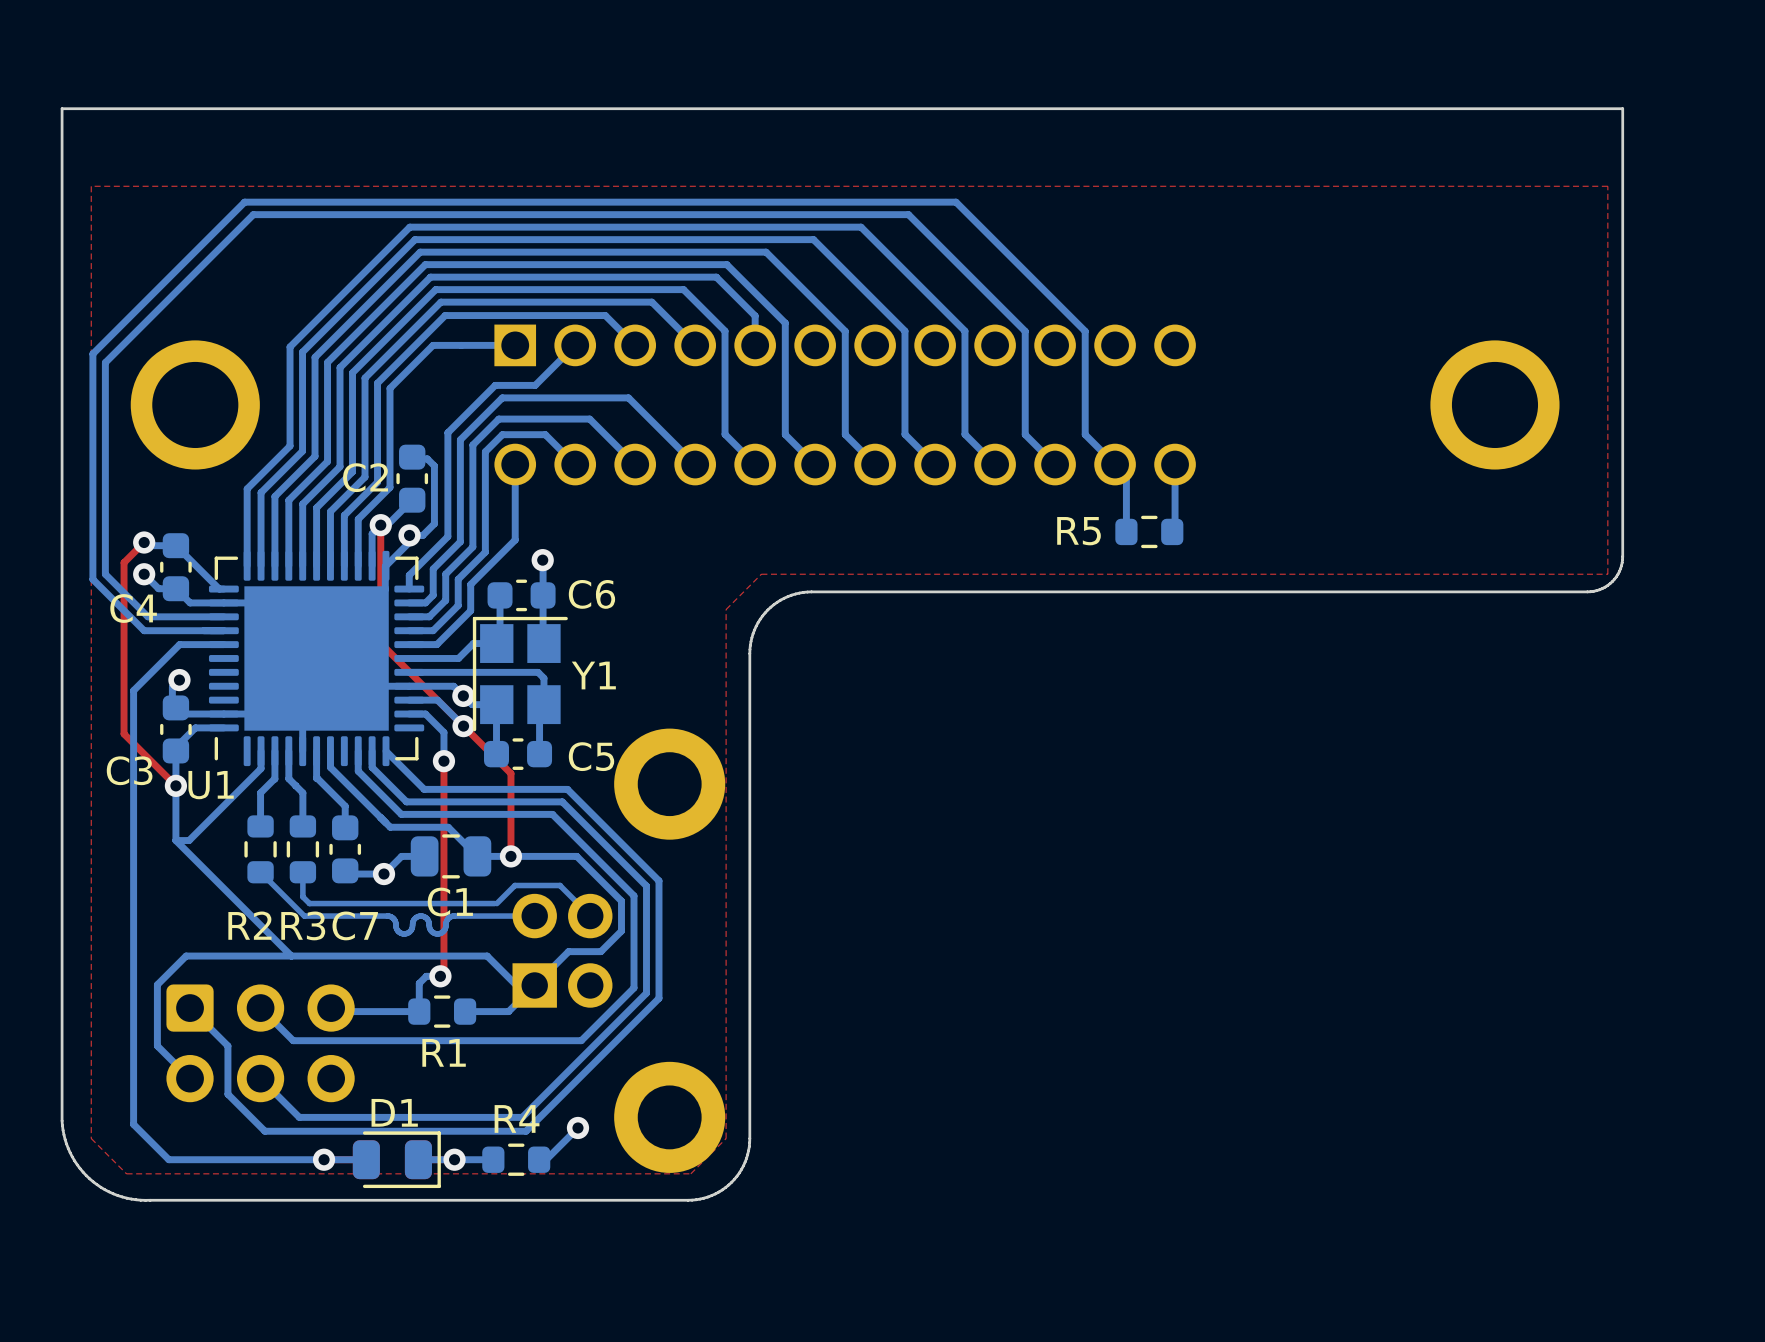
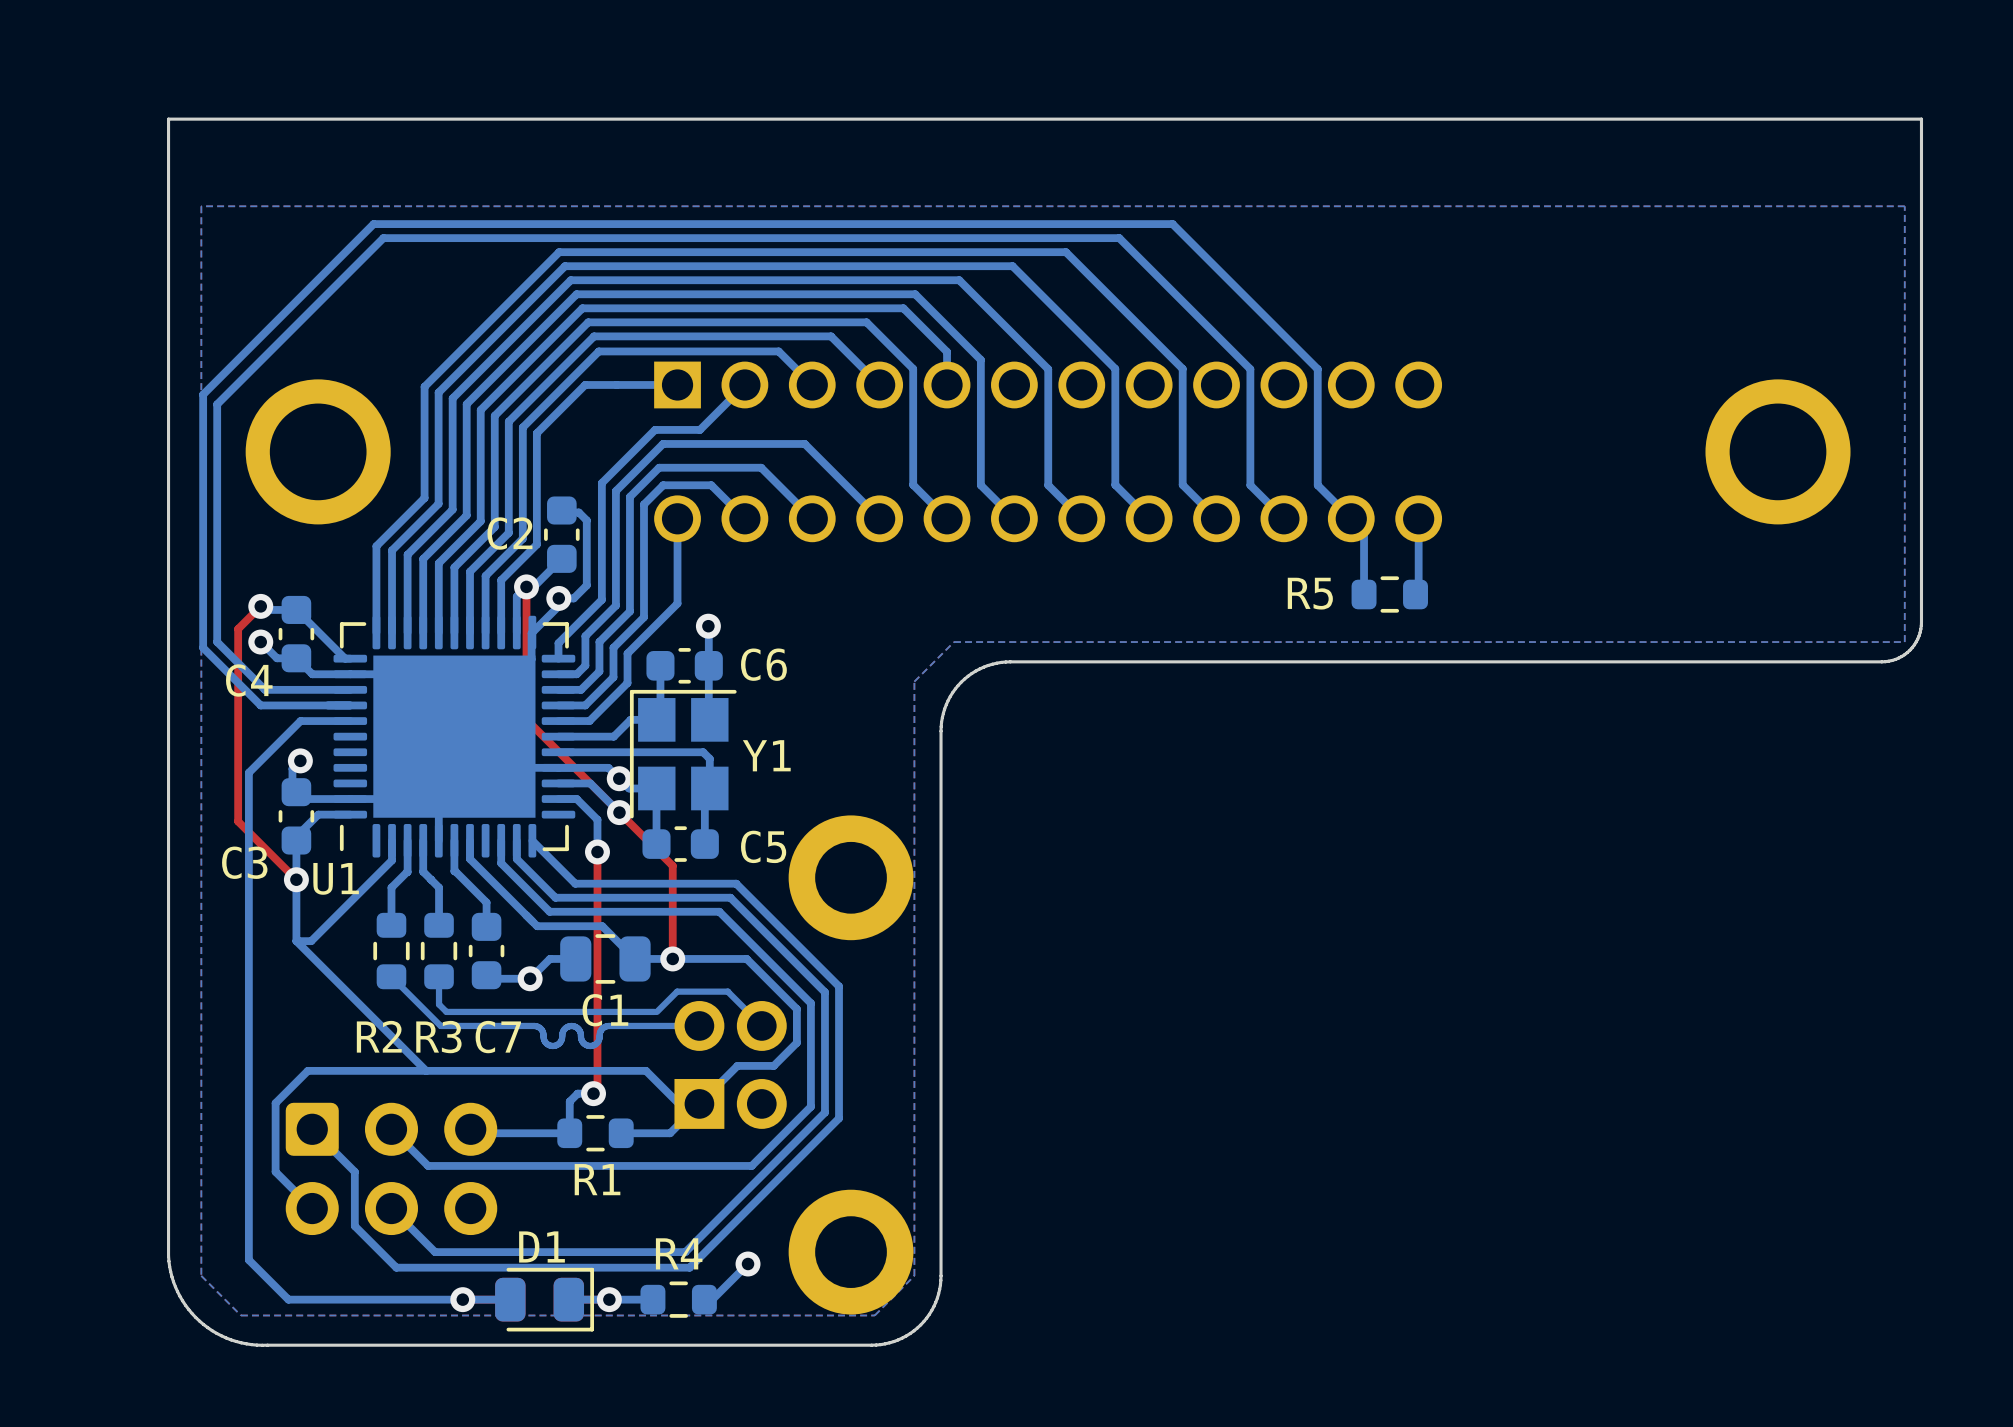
bottom zone outline: none -> (1904, 206) (1904, 642) (954, 642) (914, 681) (914, 1275) (874, 1315) (240, 1315) (201, 1275) (201, 206) (1904, 206)

